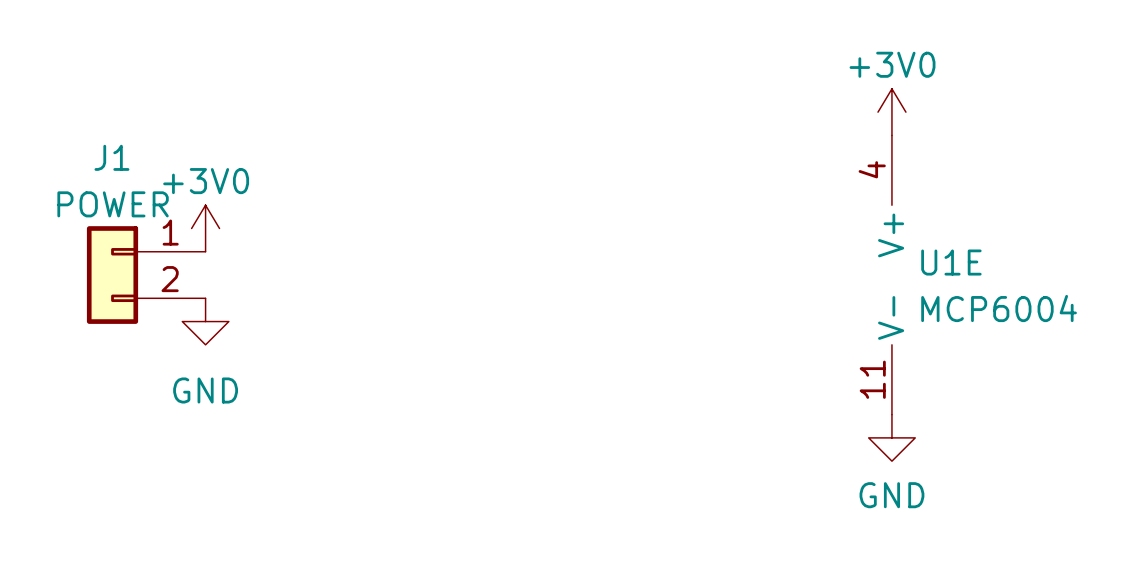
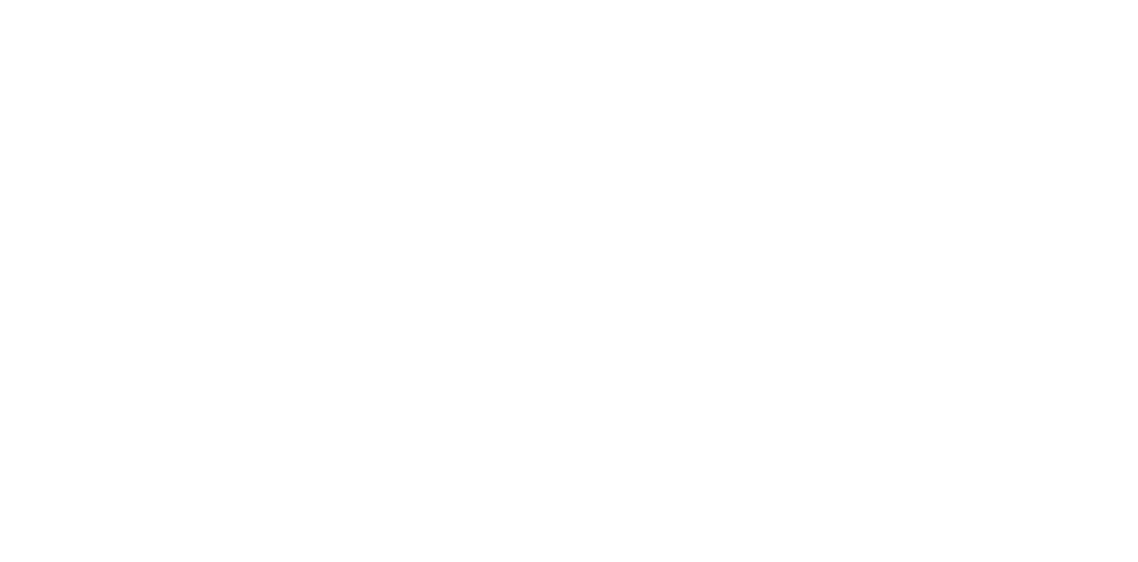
power symbol: +3V0 (891, 112) -> none
power symbol: +3V0 (205, 228) -> none
J1: POWER (146, 275) -> none
U1E: MCP6004 (891, 275) -> none
power symbol: GND (205, 321) -> none
power symbol: GND (891, 437) -> none

